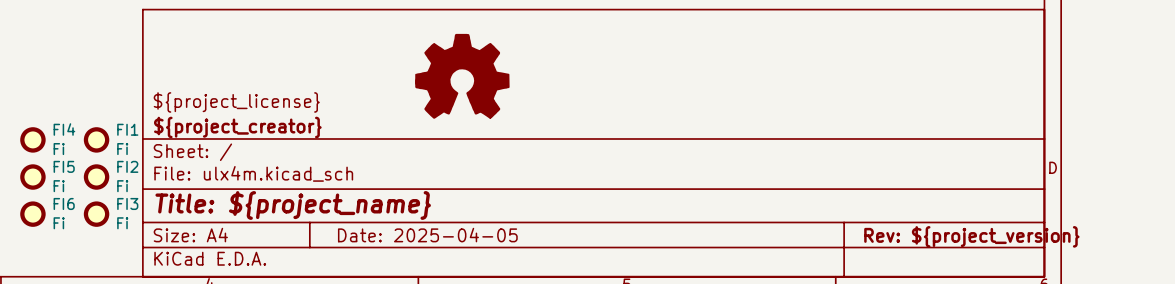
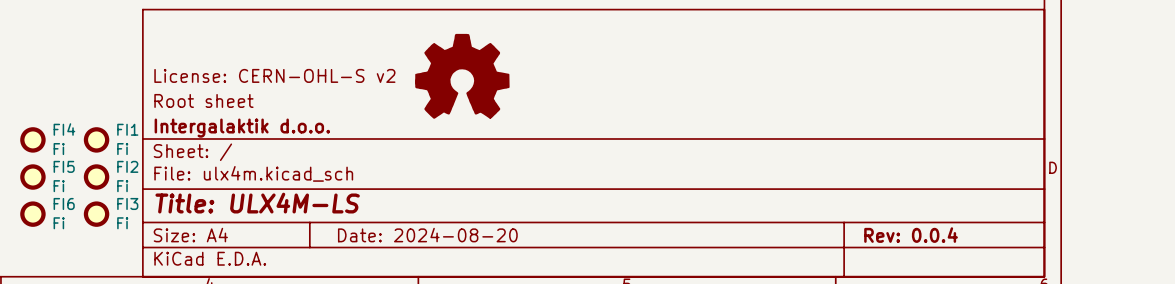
title block: none -> License: CERN-OHL-S v2 (274, 75)
title block: ${project_license} (236, 102) -> Root sheet (203, 100)
title block: ${project_creator} (237, 127) -> Intergalaktik d.o.o. (242, 128)
title block: Title: ${project_name} (293, 205) -> Title: ULX4M-LS (257, 203)
title block: Date: 2025-04-05 (427, 235) -> Date: 2024-08-20 (427, 235)
title block: Rev: ${project_version} (971, 236) -> Rev: 0.0.4 (911, 235)

